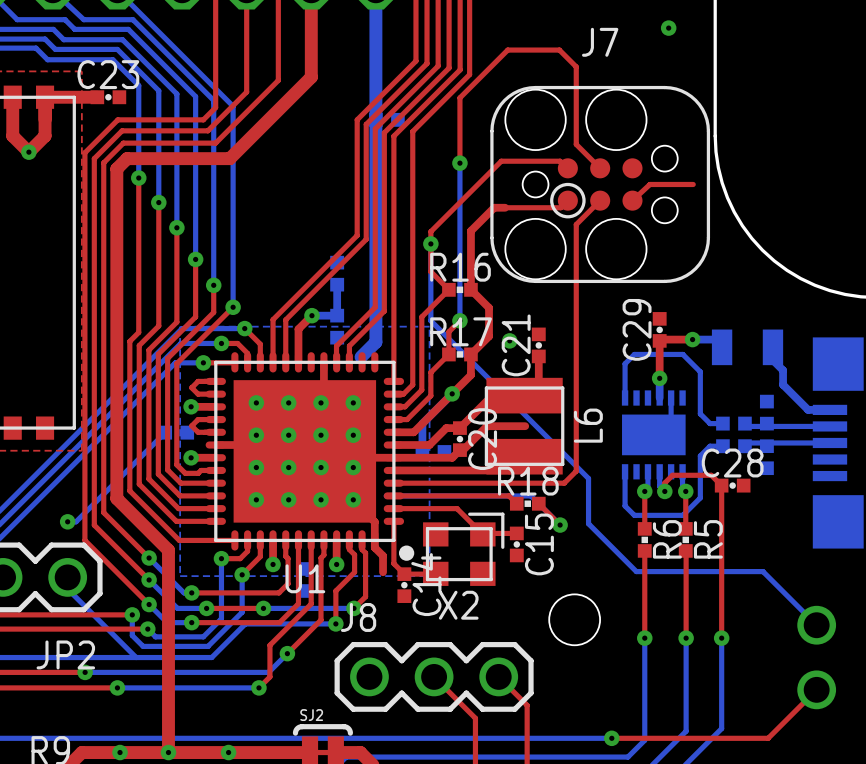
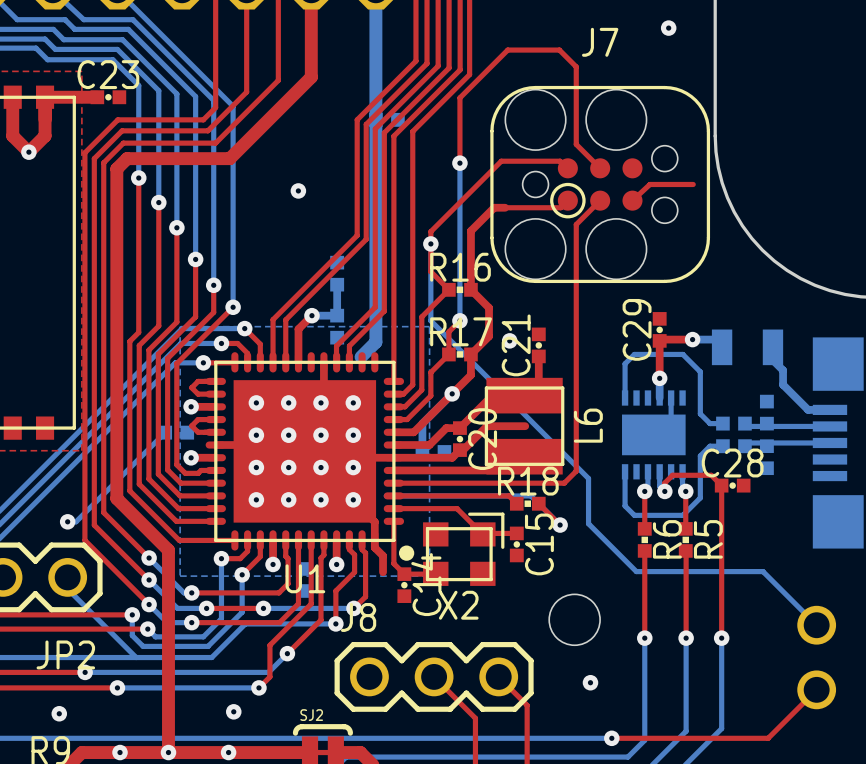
via: none -> (298, 190)
via: none -> (590, 682)
via: none -> (233, 711)
via: none -> (59, 713)

